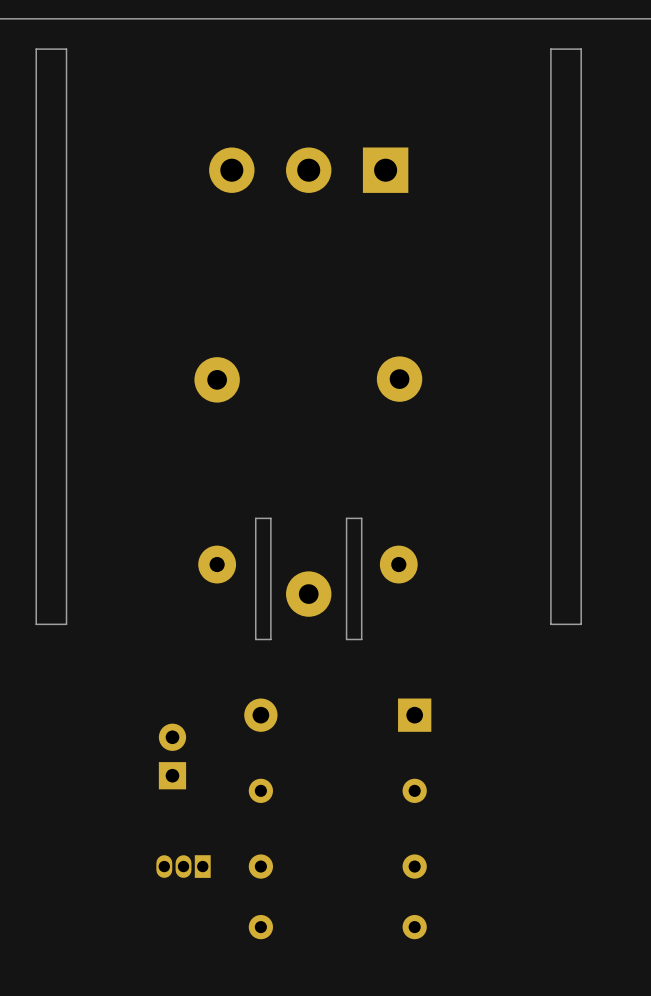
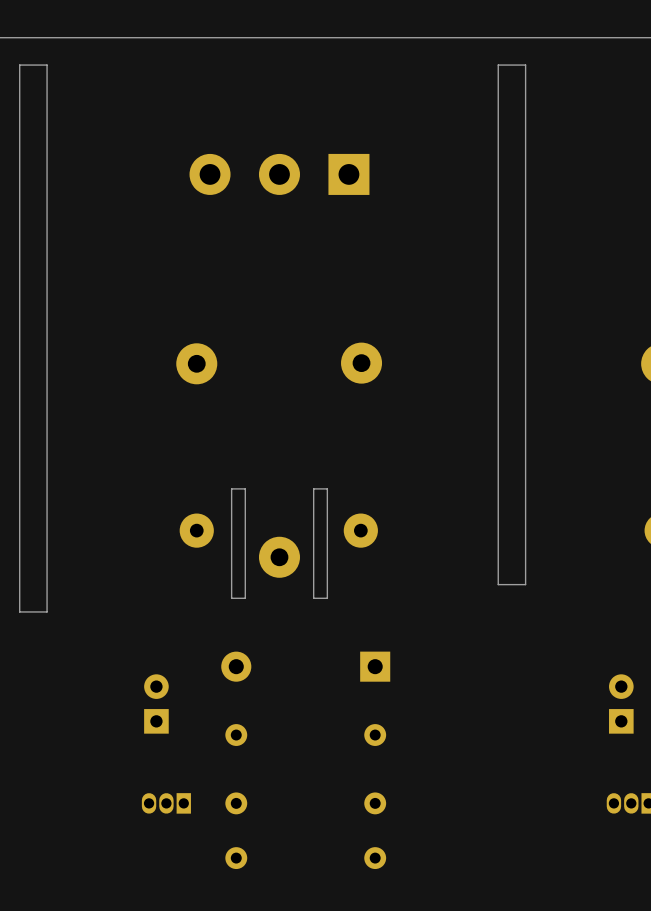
board edge: (51, 49) (66, 49) (66, 624) (36, 624) (36, 49) -> (47, 65) (47, 611) (19, 611) (19, 65) (33, 65)

